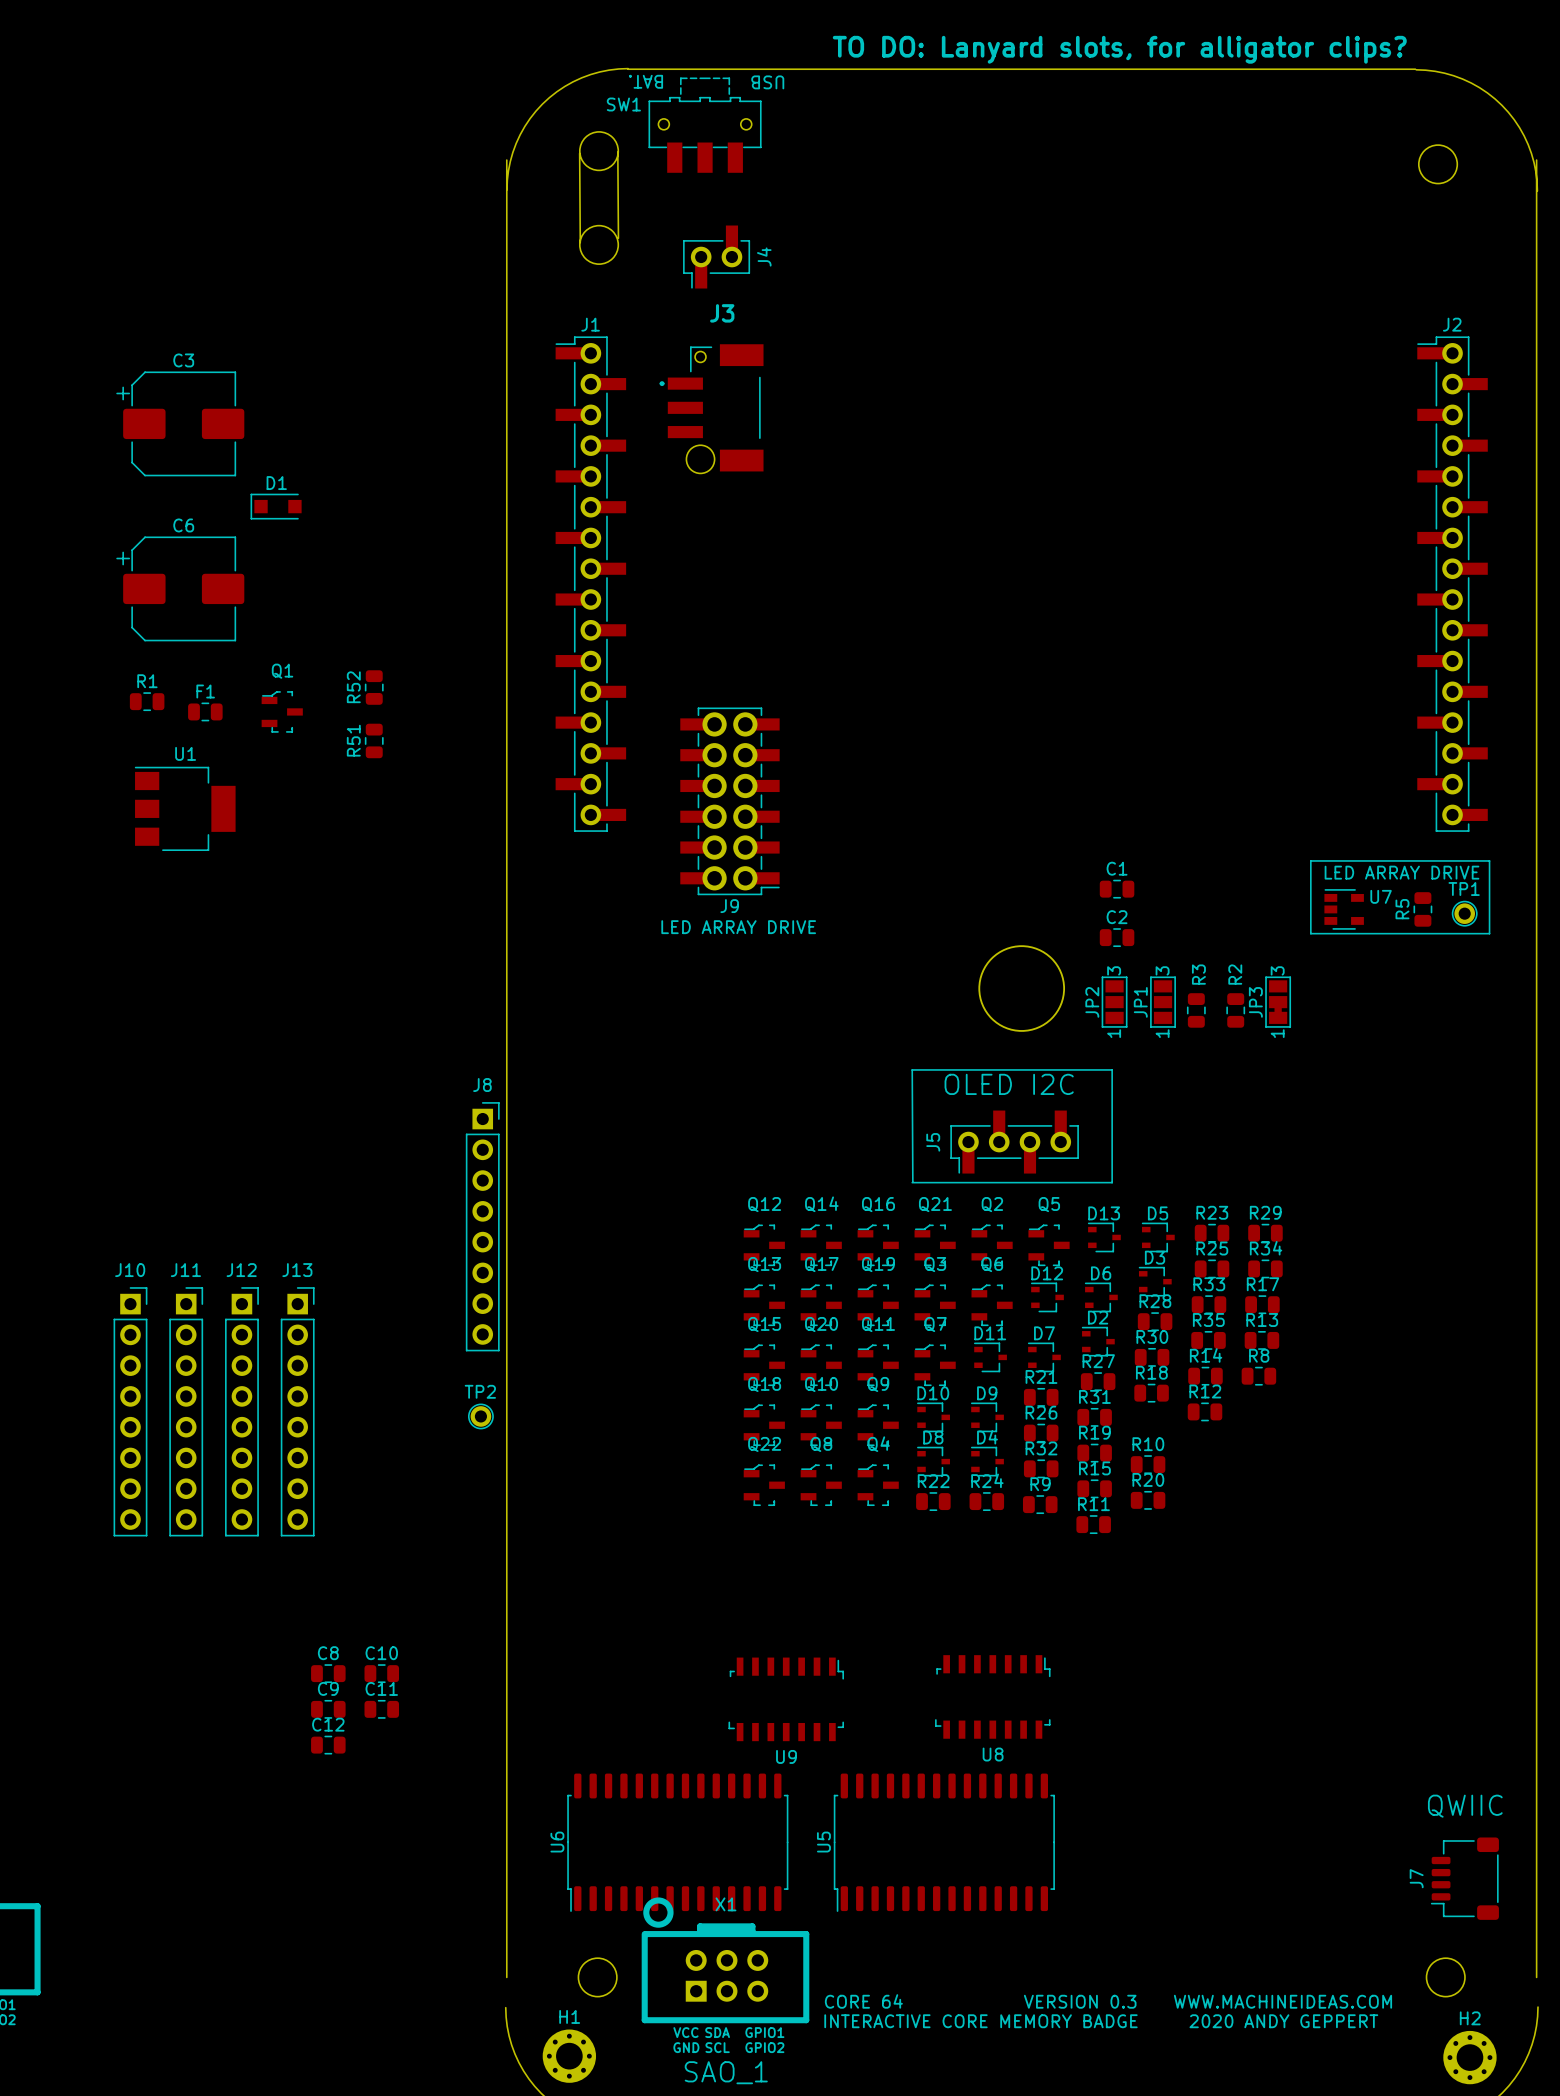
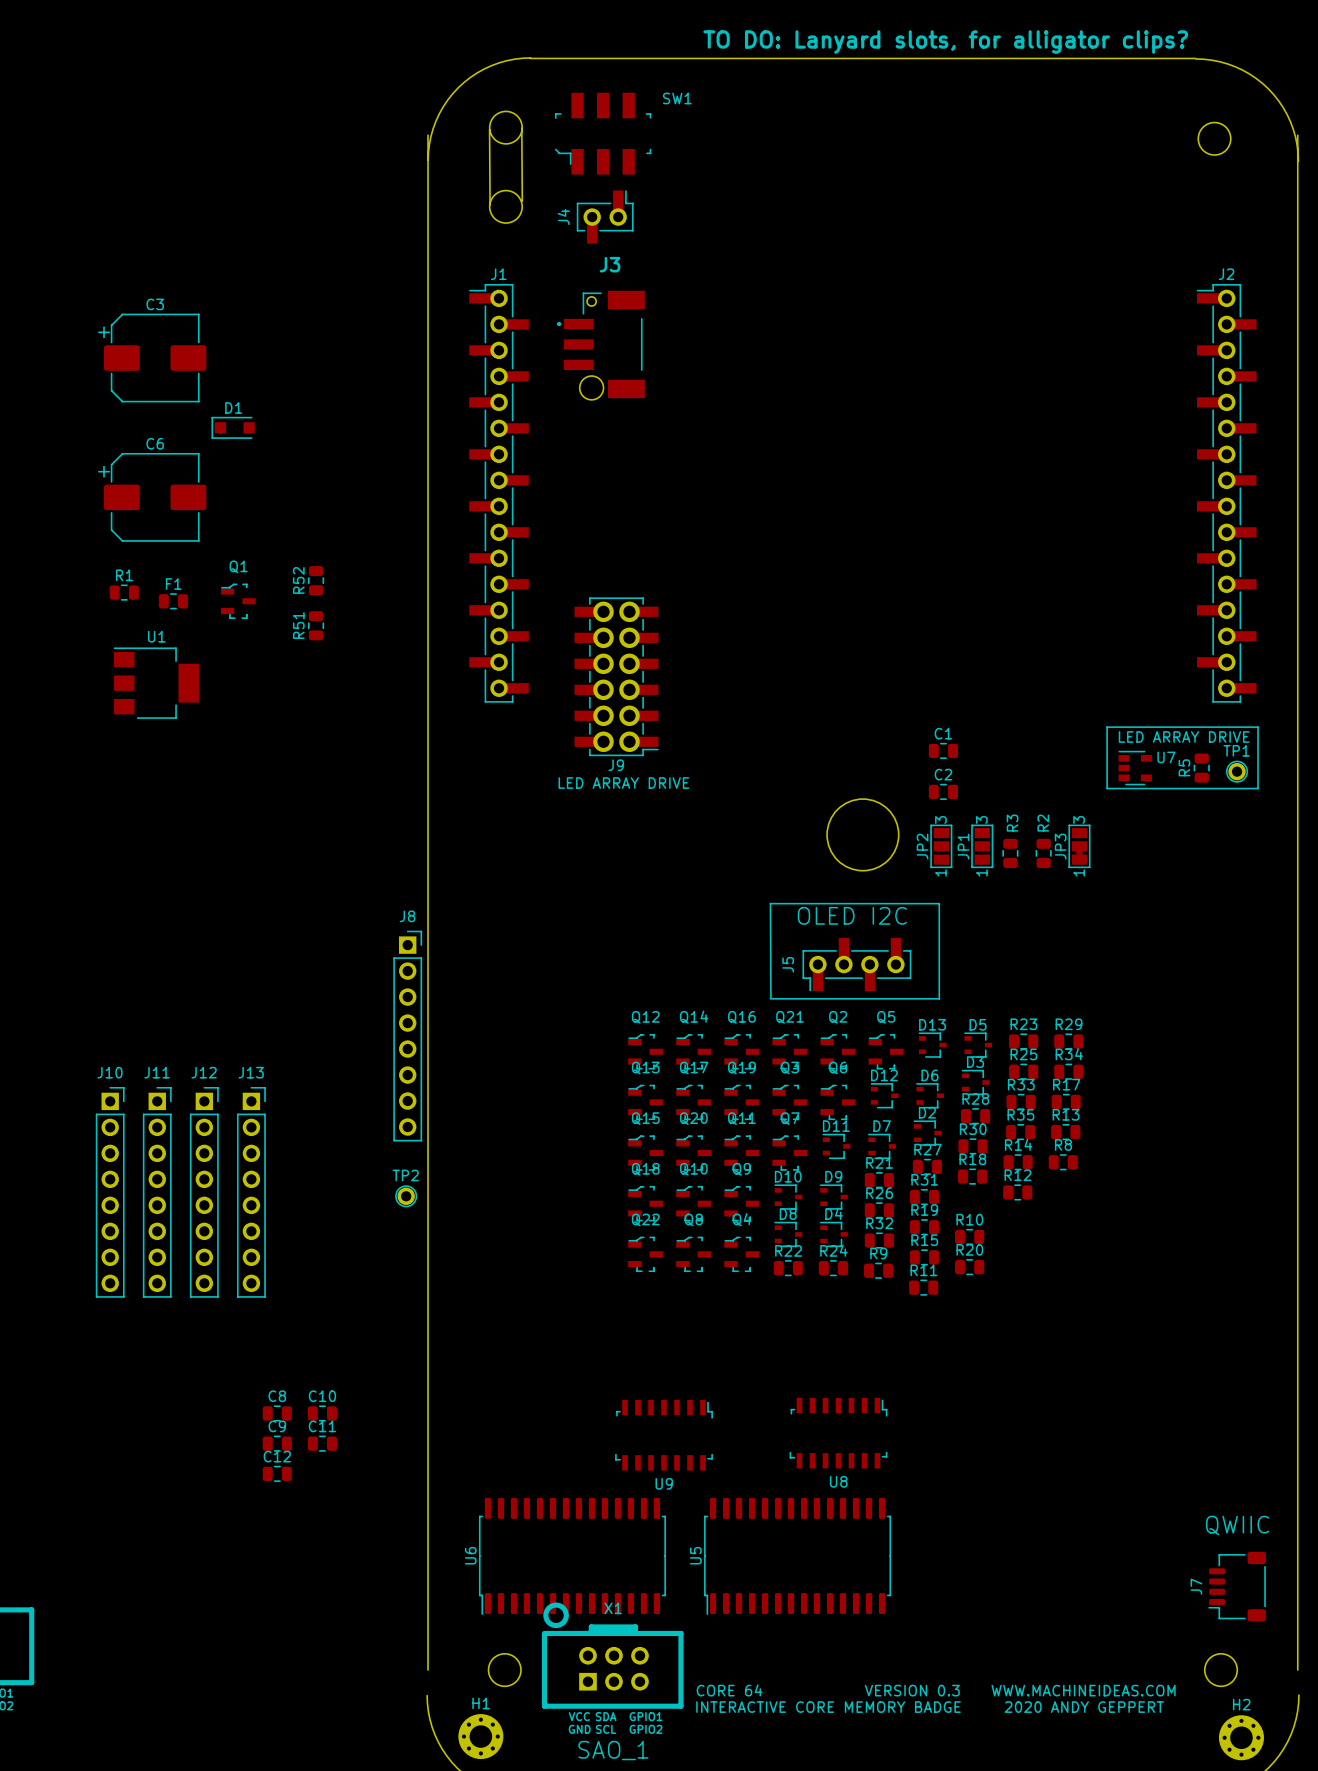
SW1 footprint: [648, 77, 762, 173] -> [555, 92, 651, 175]
text: BAT. (646, 81) -> none
text: USB (767, 82) -> none
SW1 name position: SW1 (623, 104) -> SW1 (677, 98)
J4 rotation: 0° (716, 257) -> 180° (605, 217)

